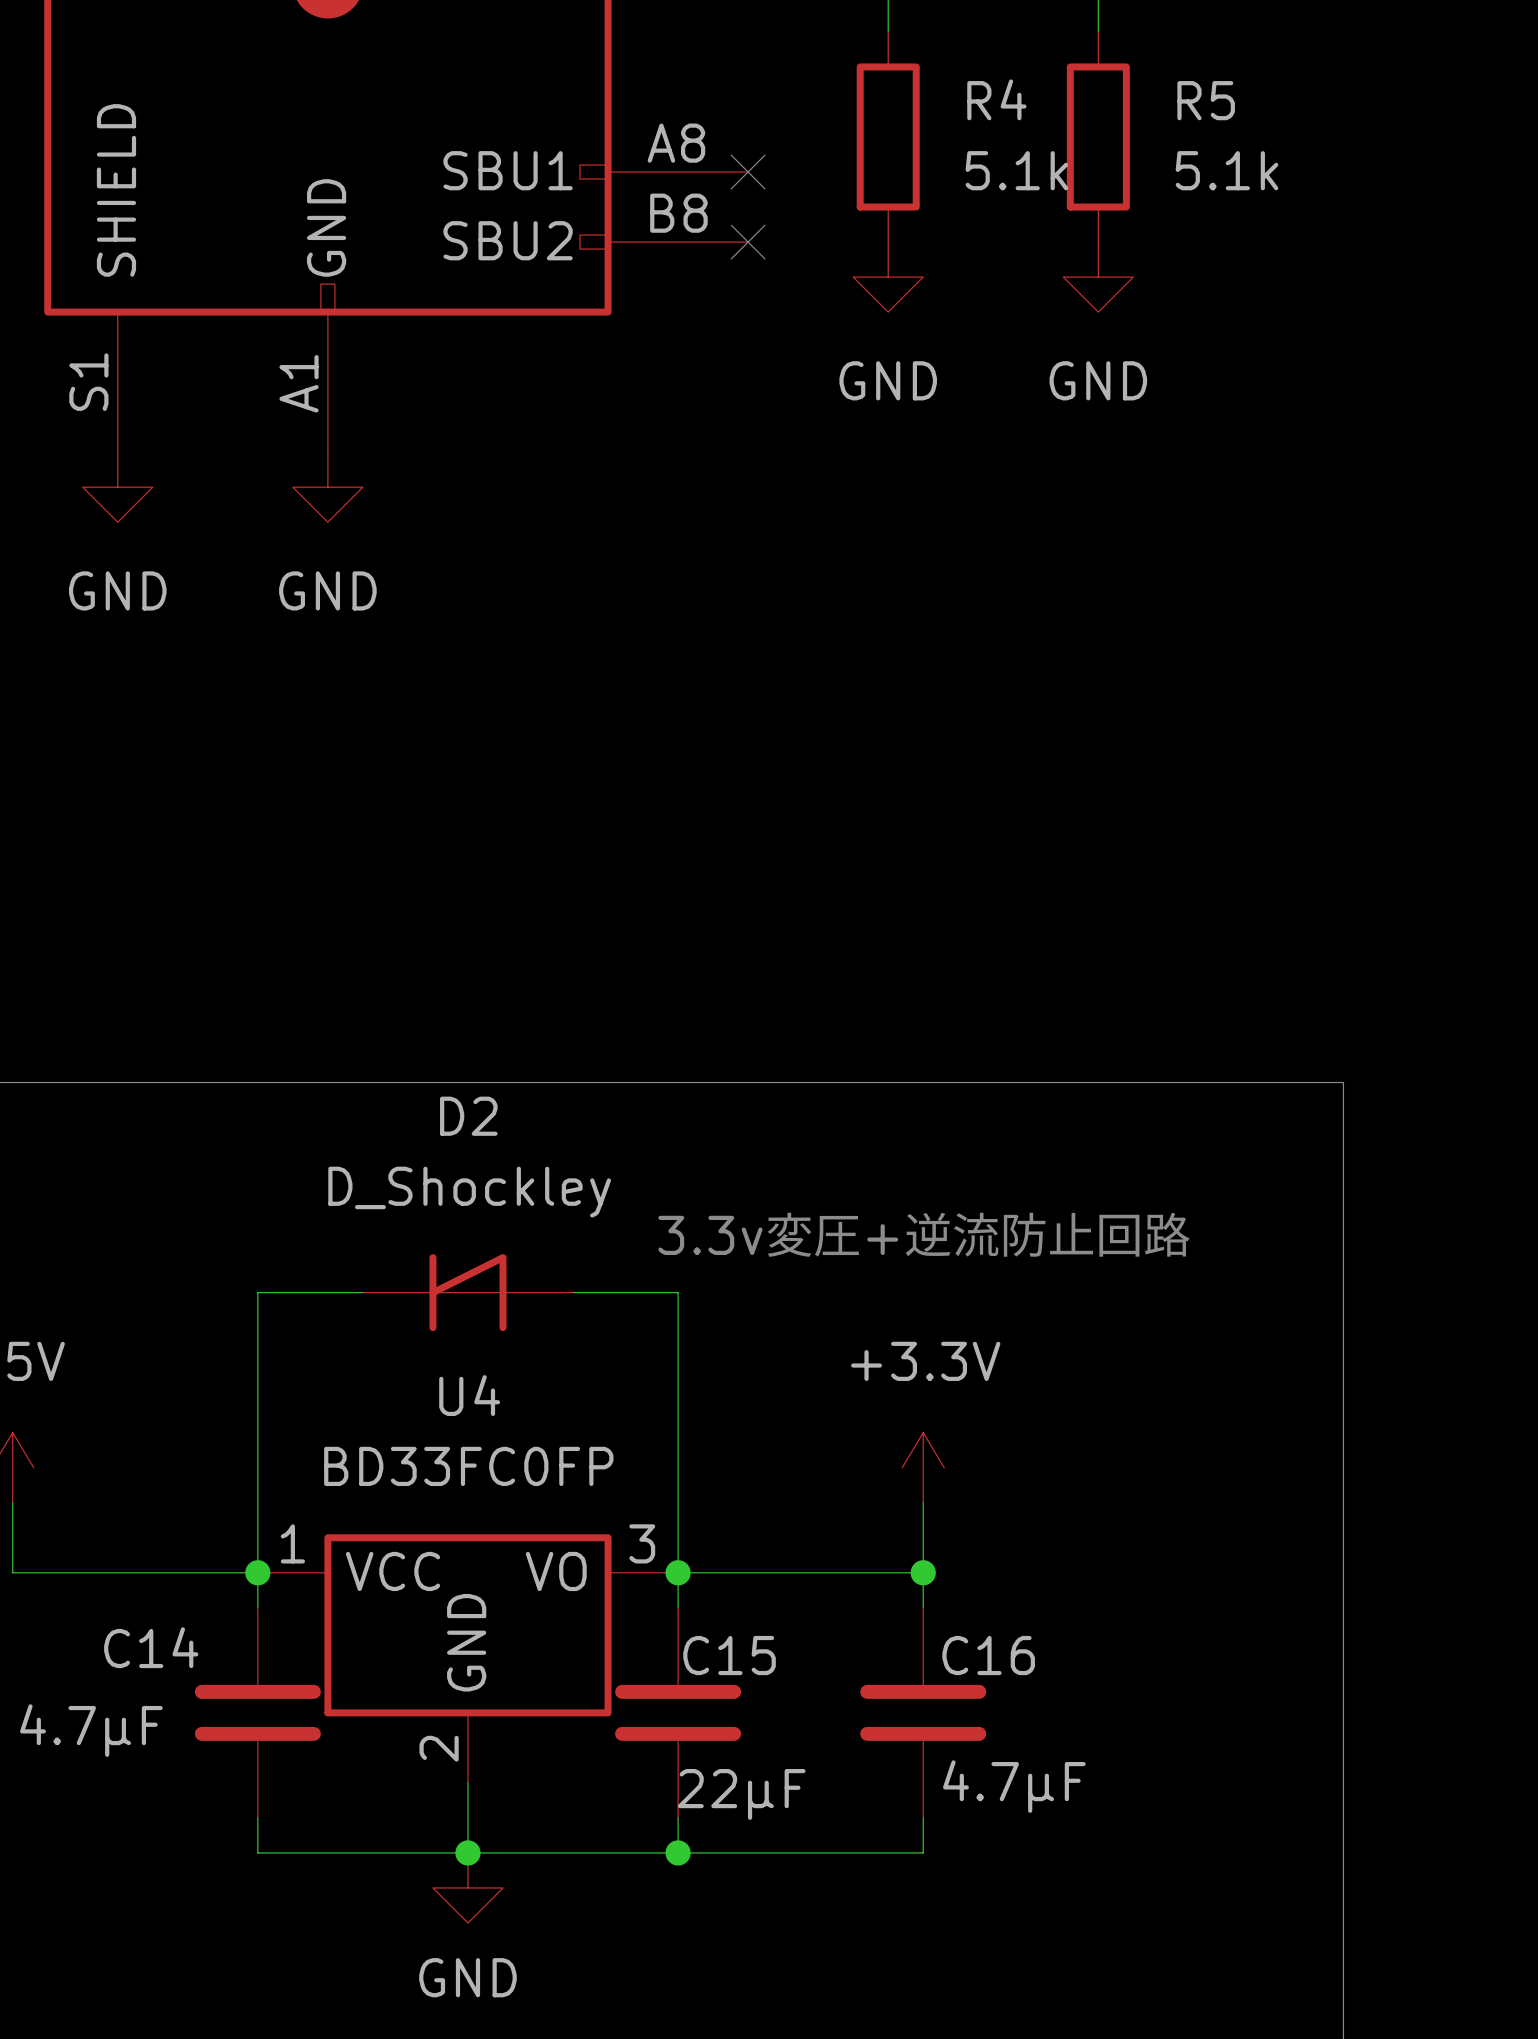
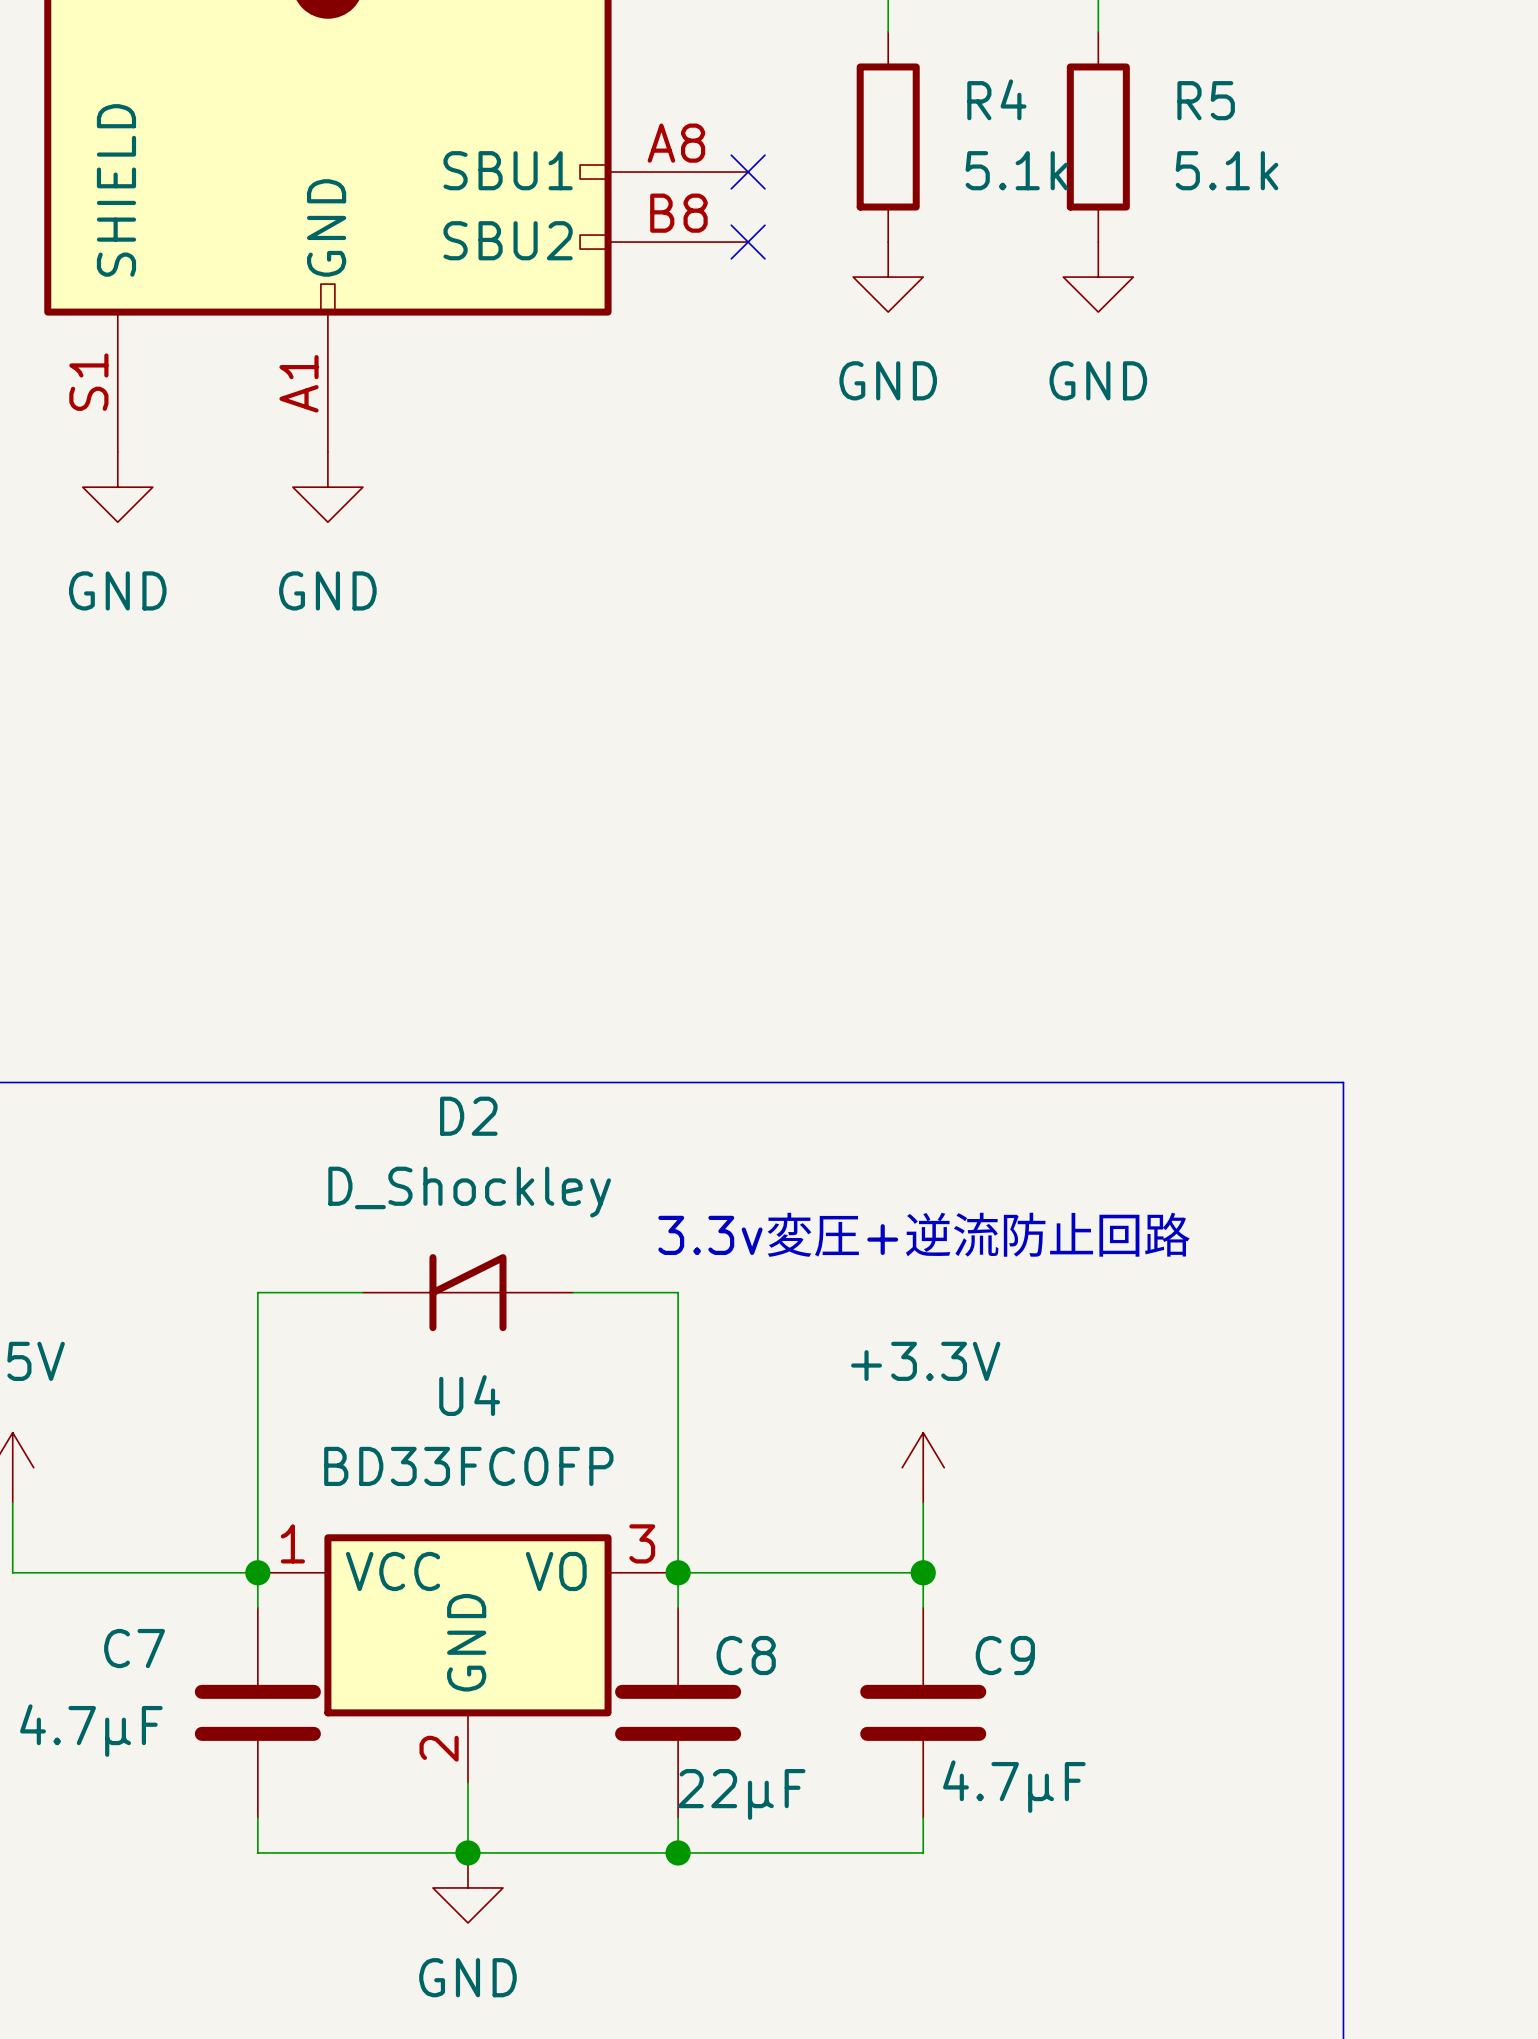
C14 name: C14 (151, 1647) -> C7 (134, 1648)
C15 name: C15 (729, 1655) -> C8 (746, 1655)
C16 name: C16 (988, 1655) -> C9 (1005, 1655)

